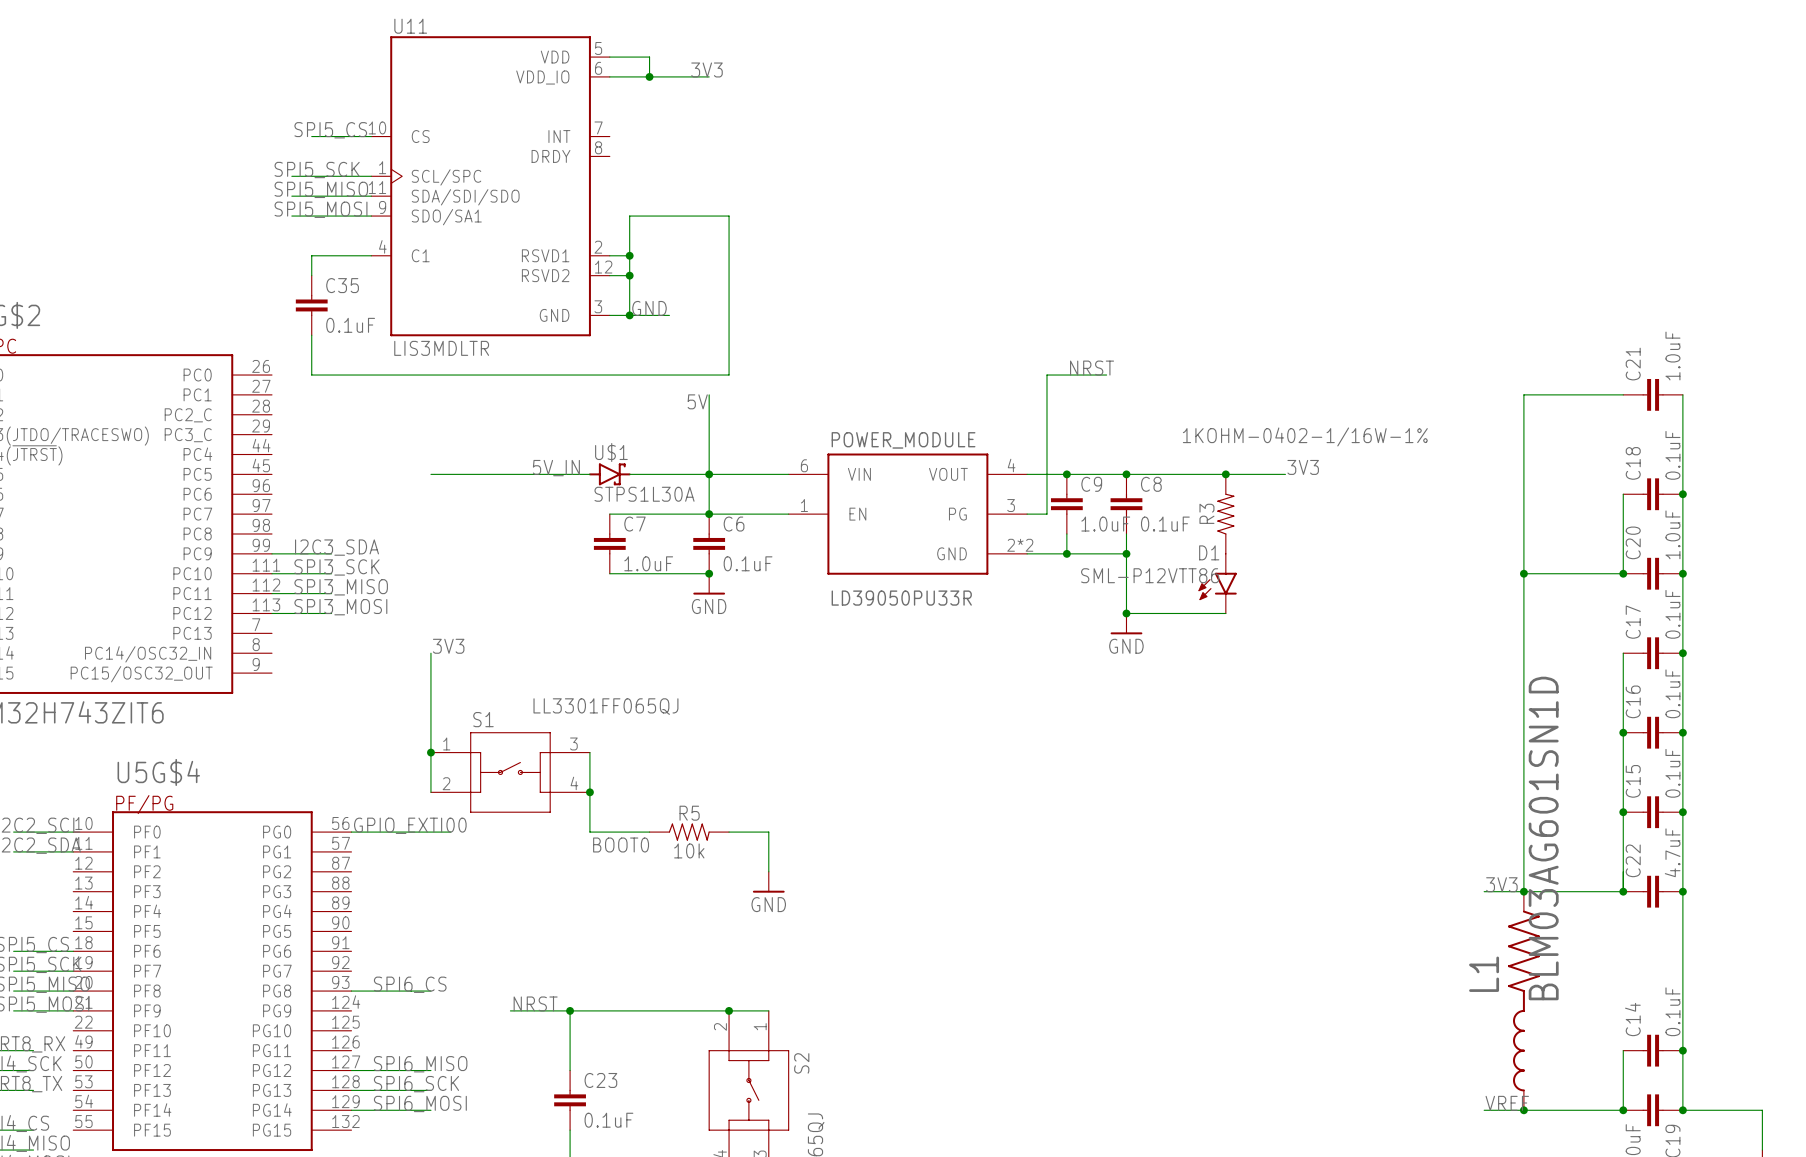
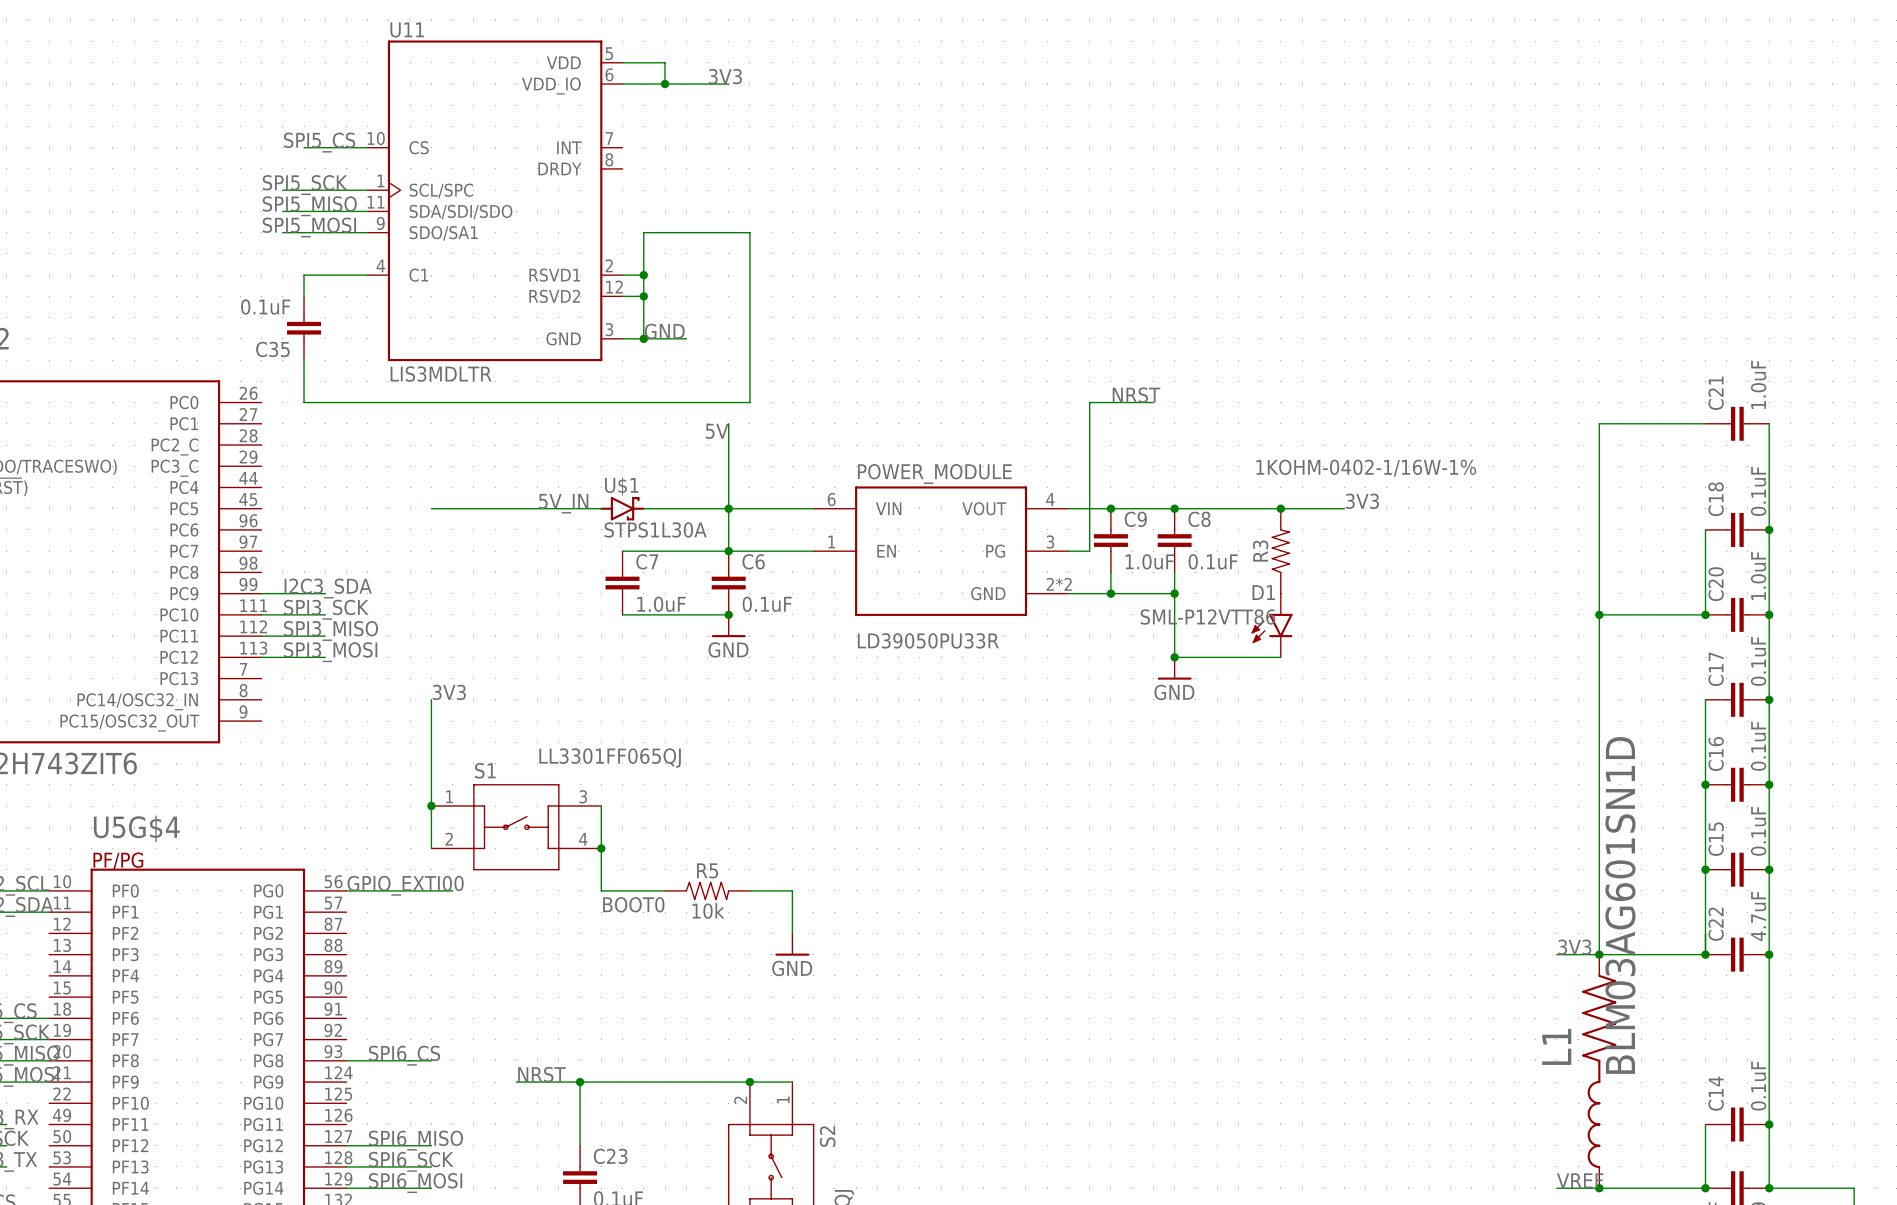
C35 name position: C35 (342, 285) -> C35 (272, 349)
C35 value position: 0.1uF (350, 325) -> 0.1uF (265, 306)

